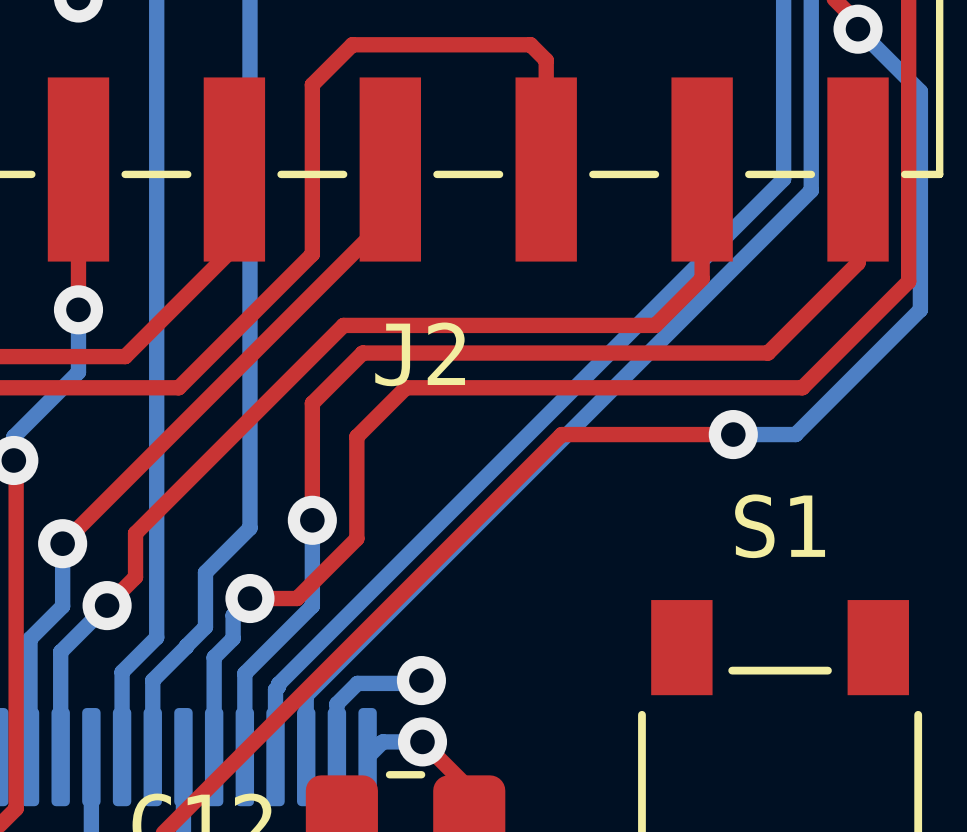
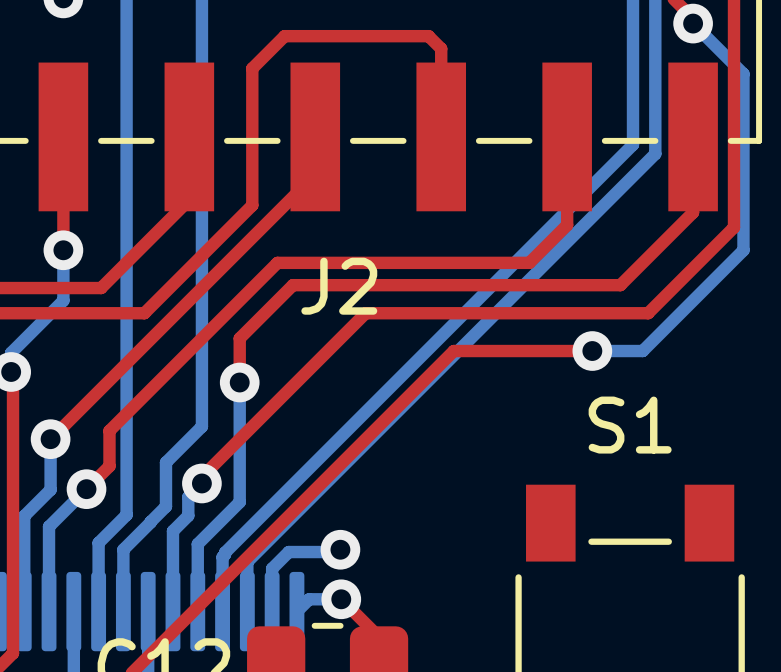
top track: (452, 387) (405, 387) (356, 436) (356, 538) (297, 598) (249, 598) -> (365, 313) (201, 476) (201, 483)
top track: (312, 403) (312, 520) -> (252, 325) (239, 338) (239, 382)
bottom track: (312, 520) (312, 606) (296, 621) -> (239, 382) (239, 502)
via position: (312, 520) -> (239, 382)

